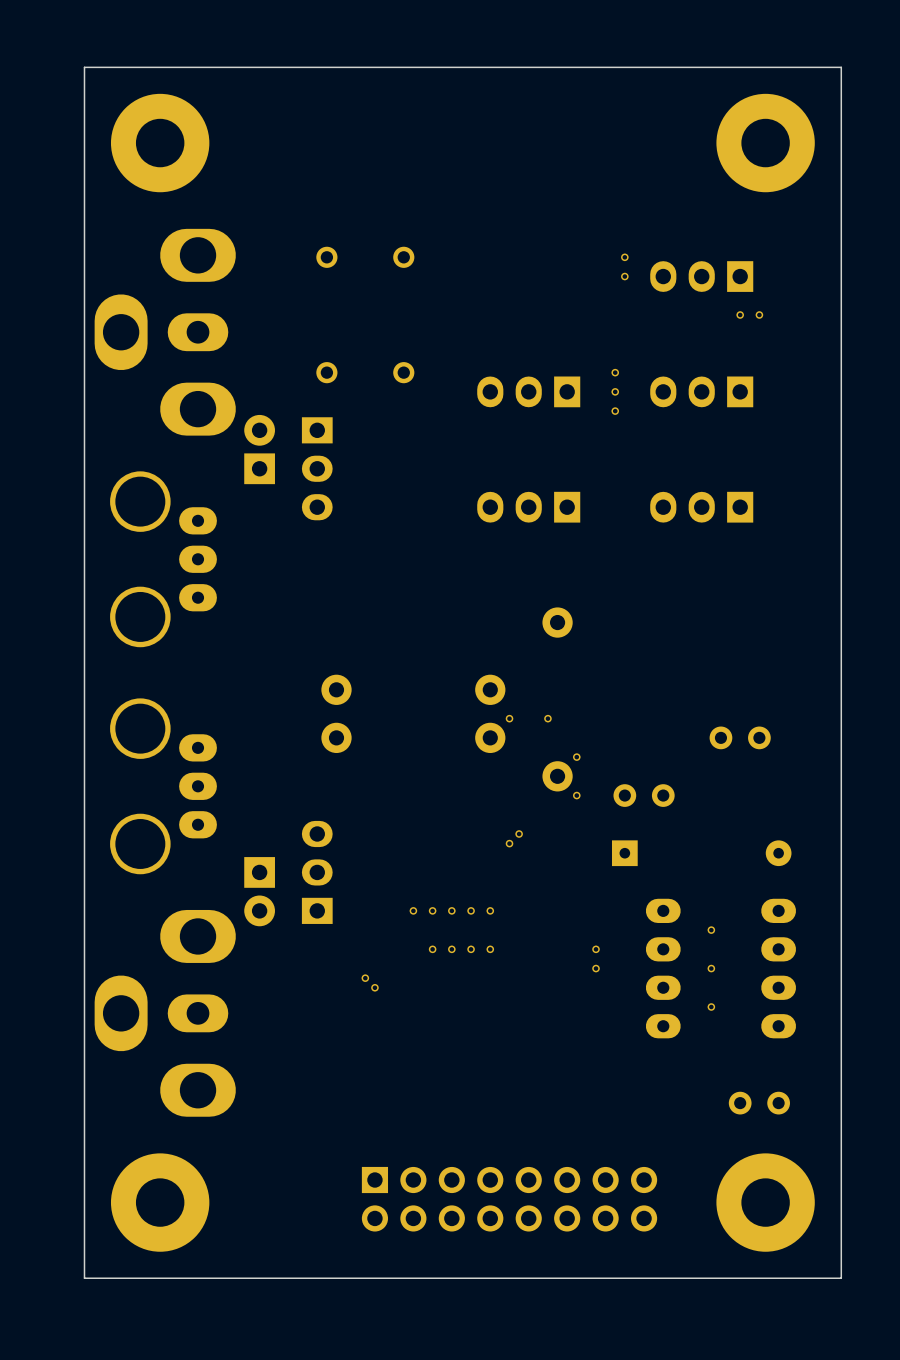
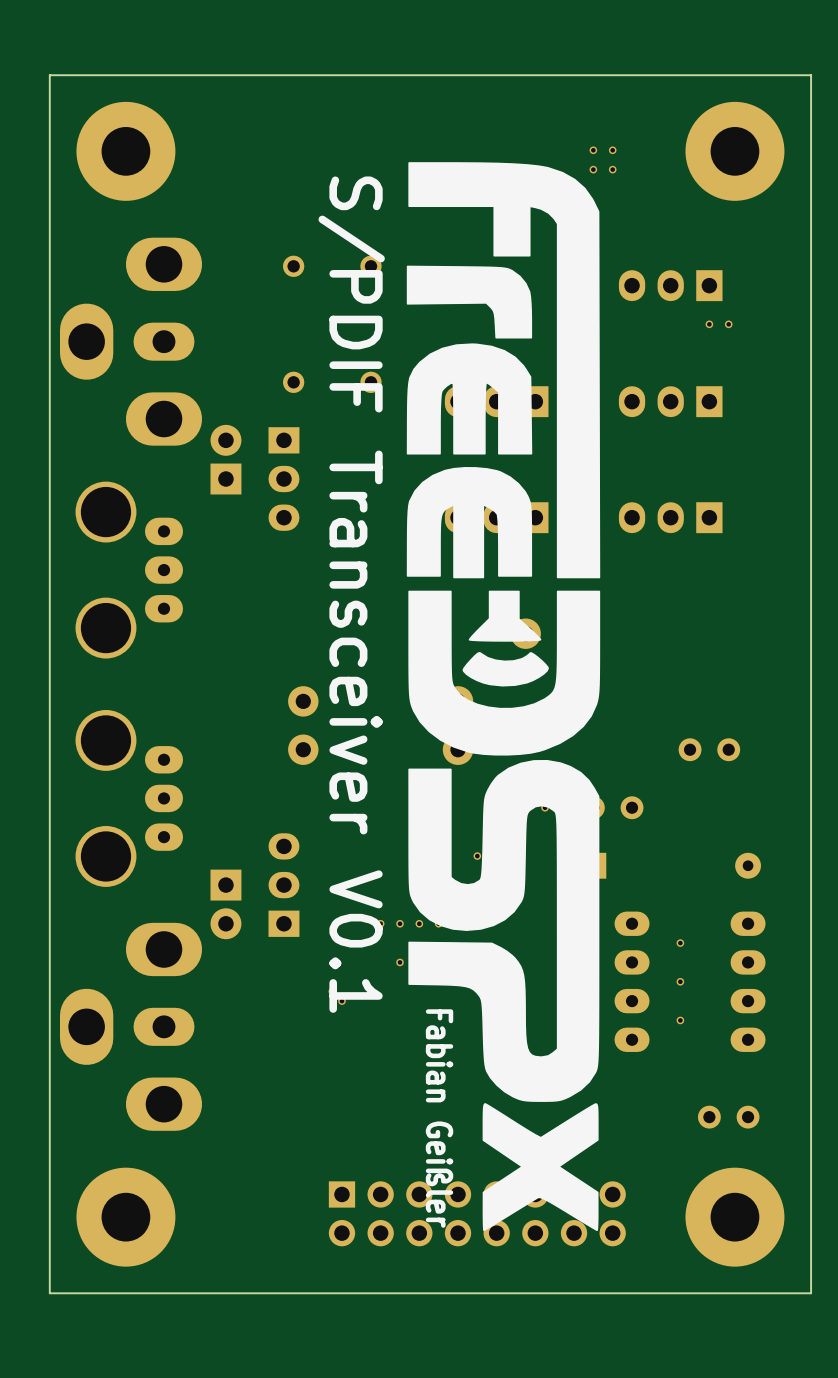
part: none -> (593, 150)
part: none -> (612, 150)
drawing: none -> [406, 162, 601, 1232]
part: none -> (593, 169)
part: none -> (612, 169)
text: none -> S/PDIF Transceiver V0.1 (351, 594)
text: none -> Fabian Geißler (439, 1118)

